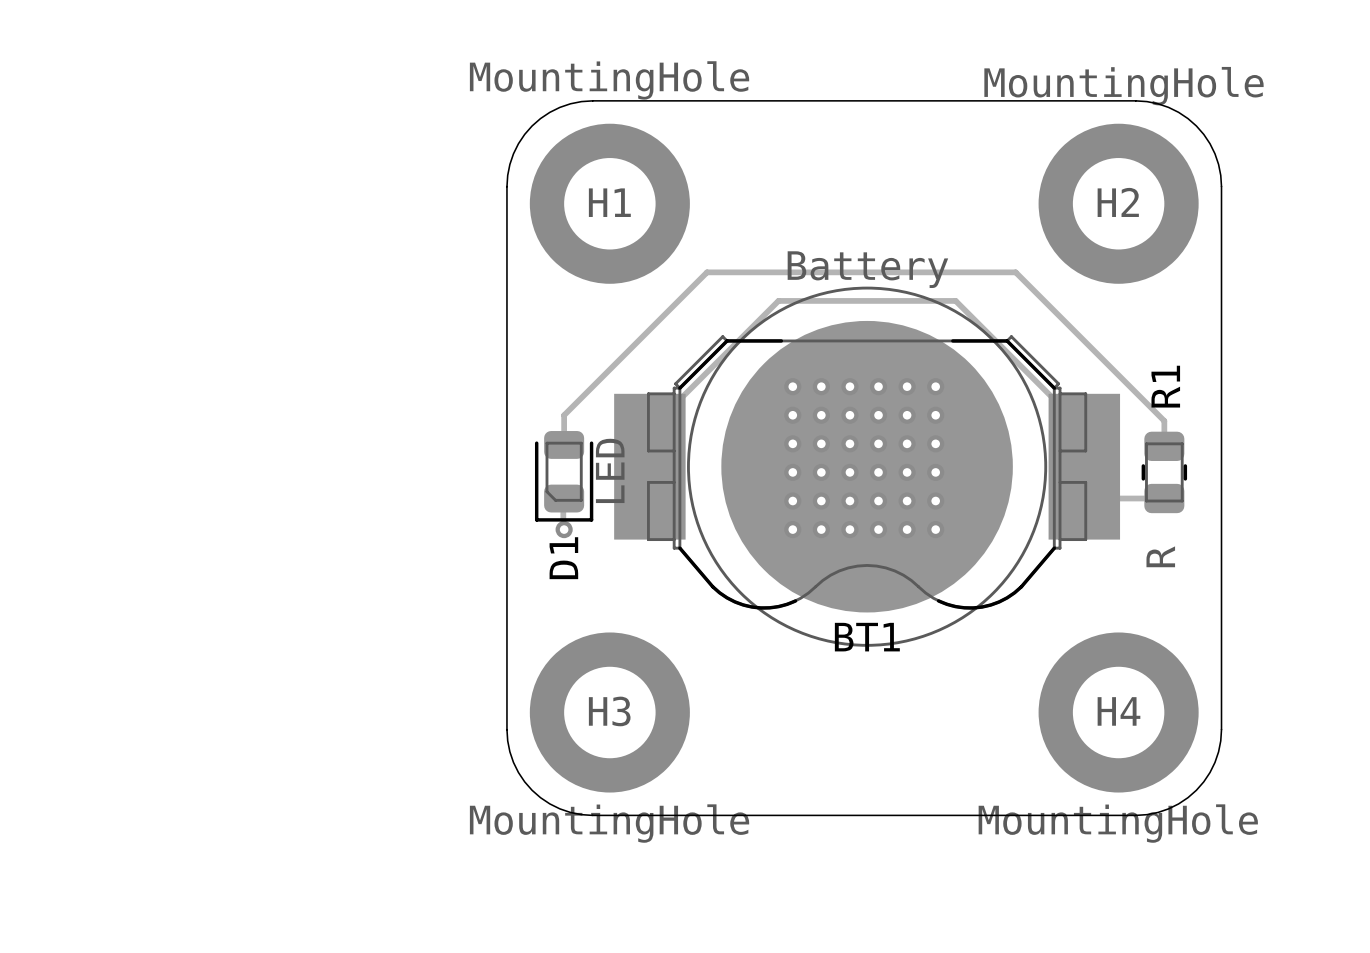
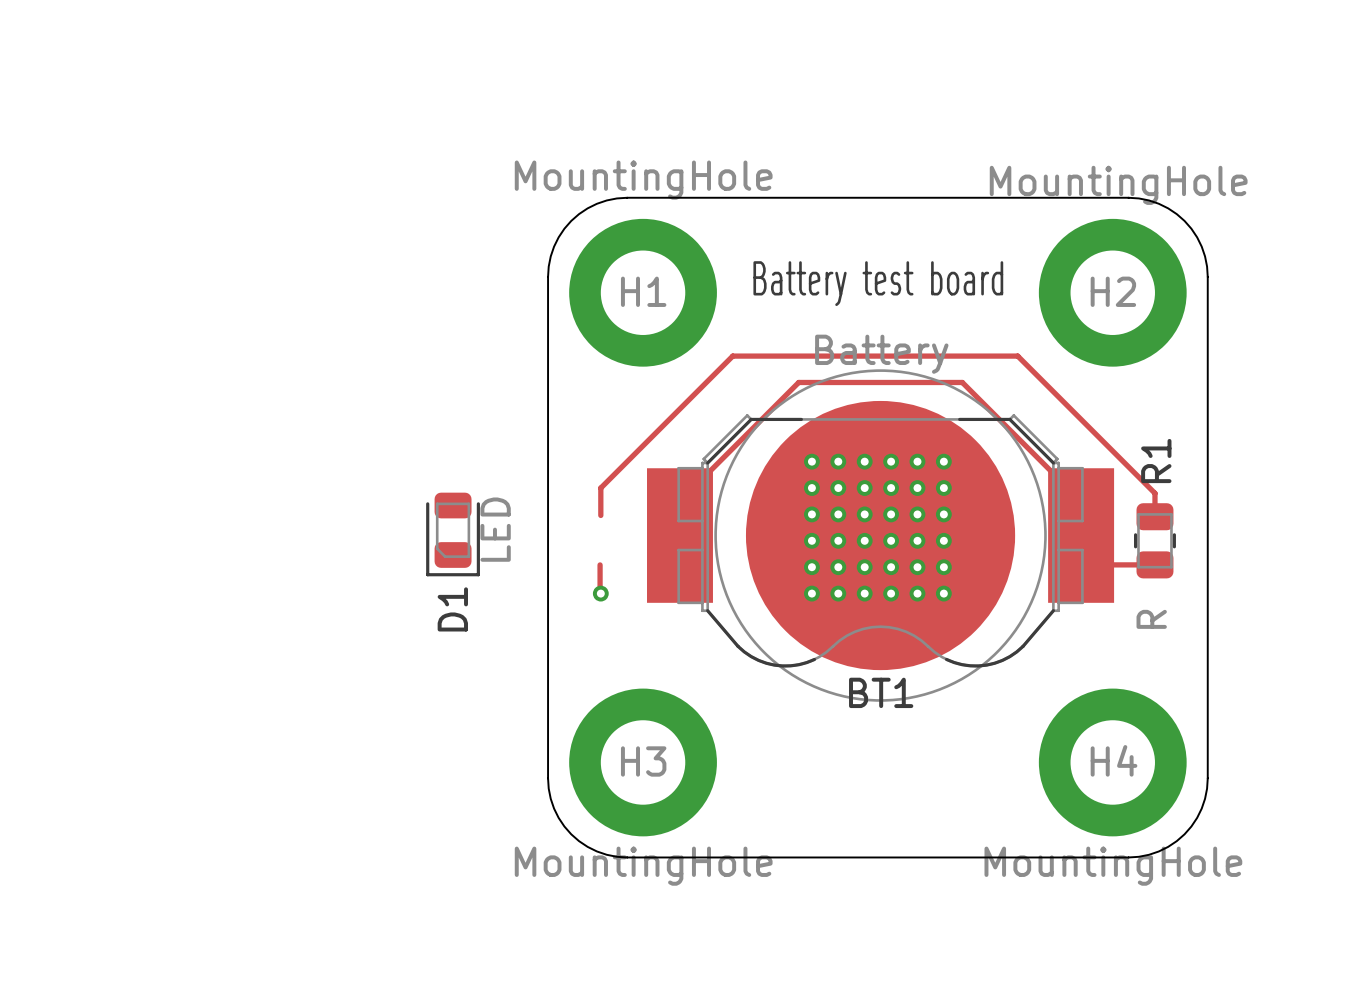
text: none -> Battery test board (878, 283)
D1 position: (564, 476) -> (453, 534)

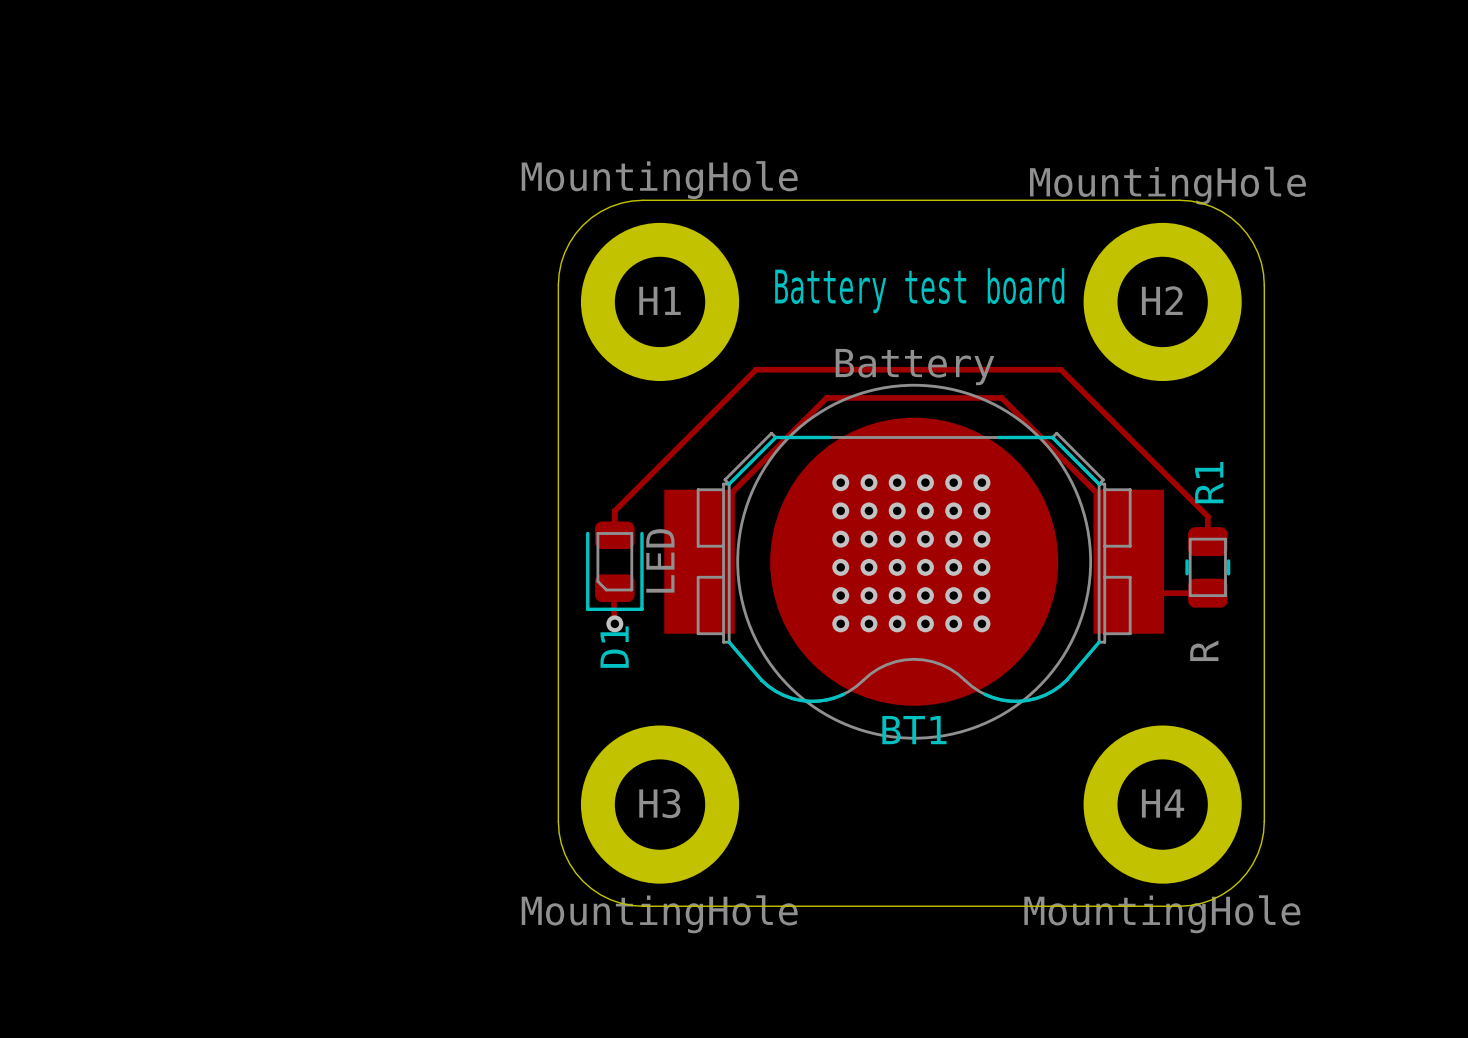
D1 position: (453, 534) -> (614, 566)

